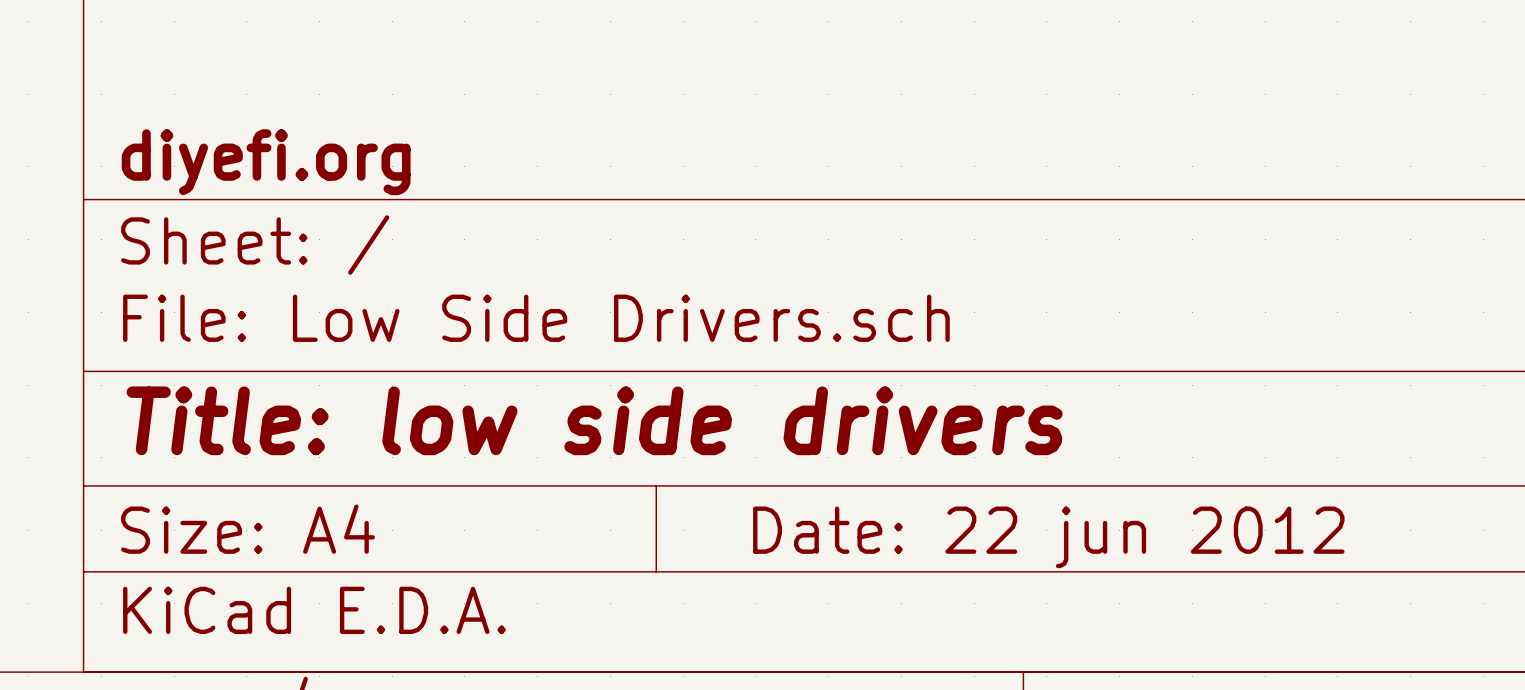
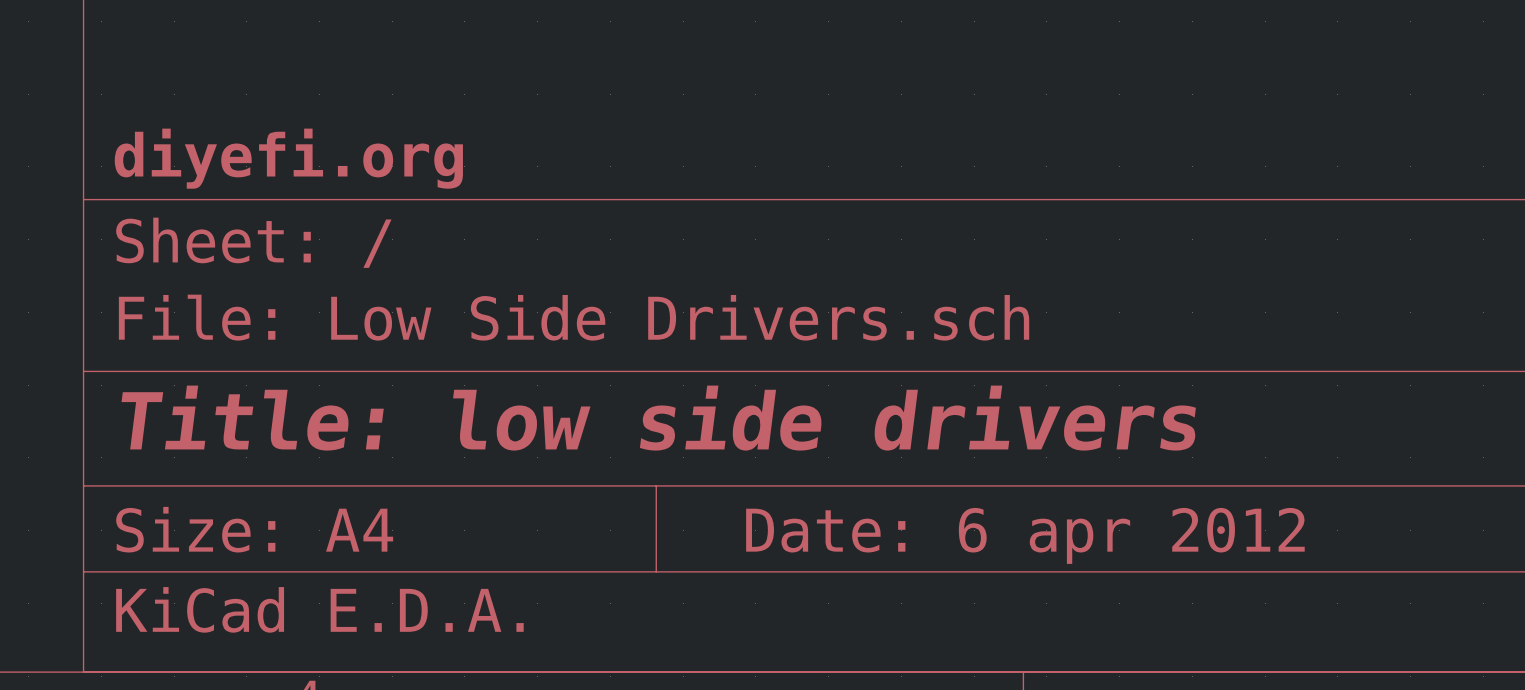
title block: Date: 22 jun 2012 (1048, 537) -> Date: 6 apr 2012 (1025, 535)

